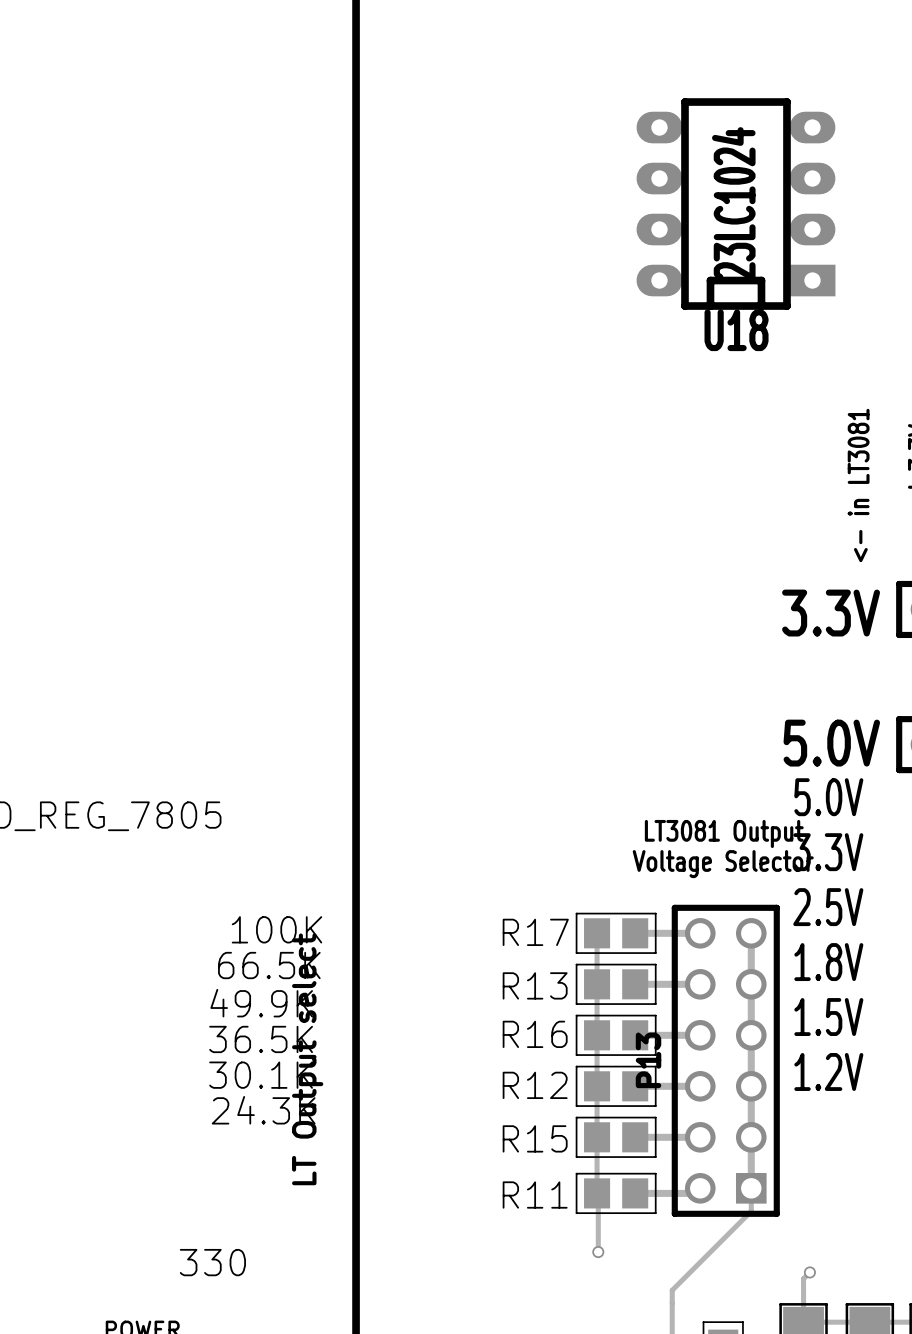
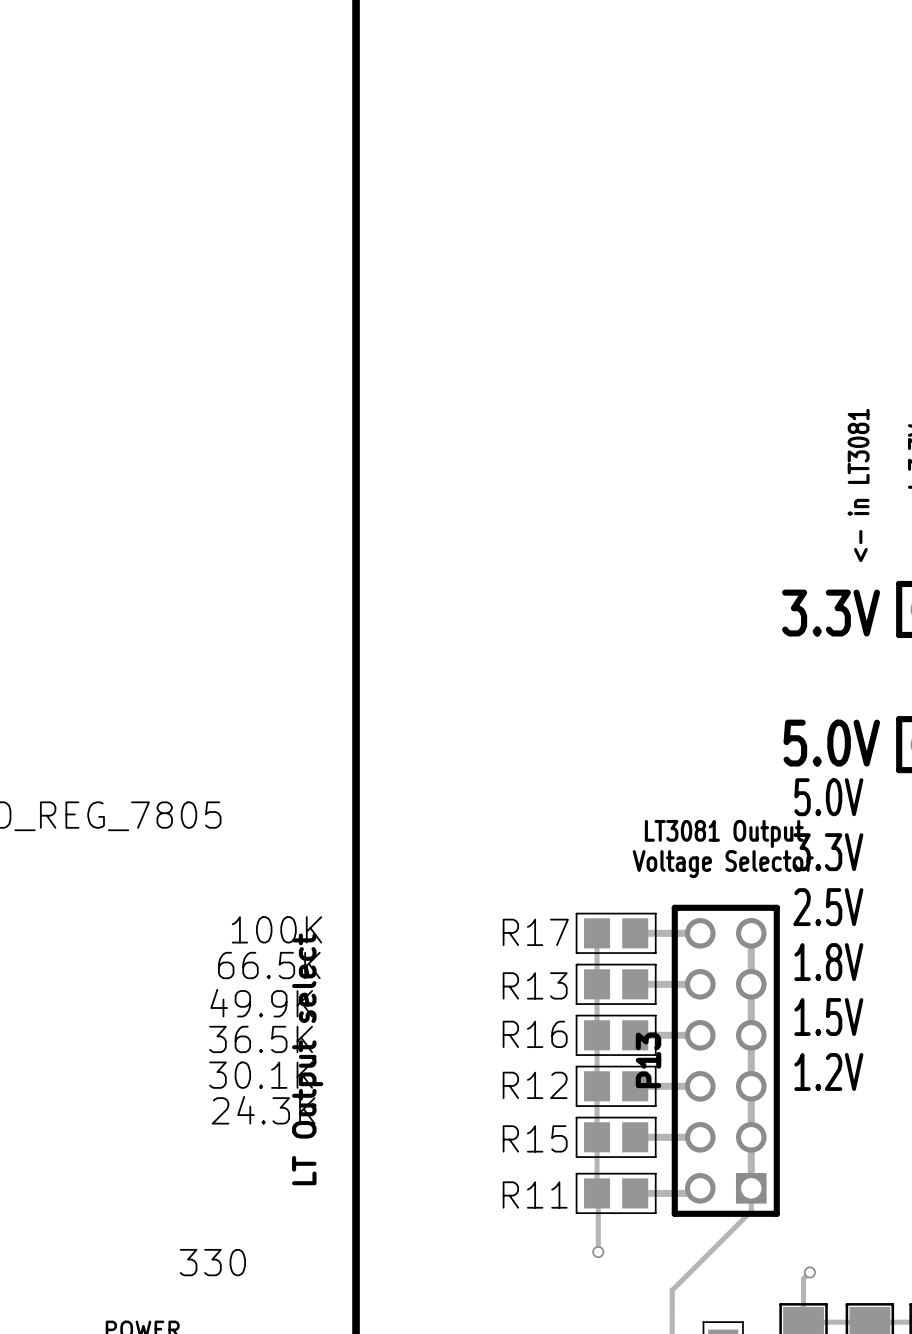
U18: 23LC1024 (735, 204) -> none

